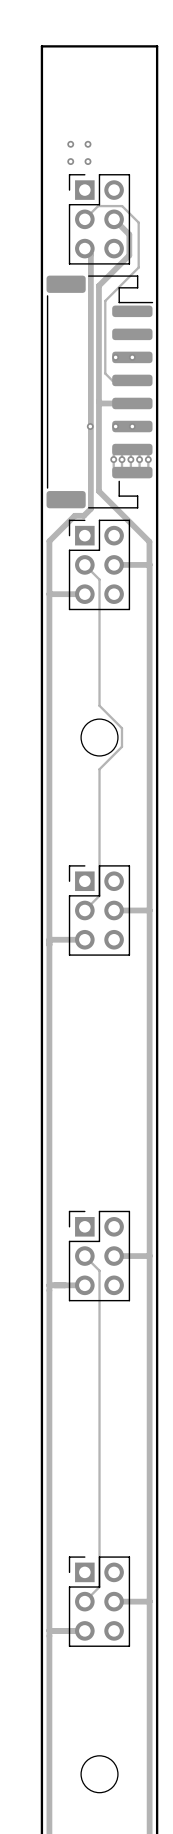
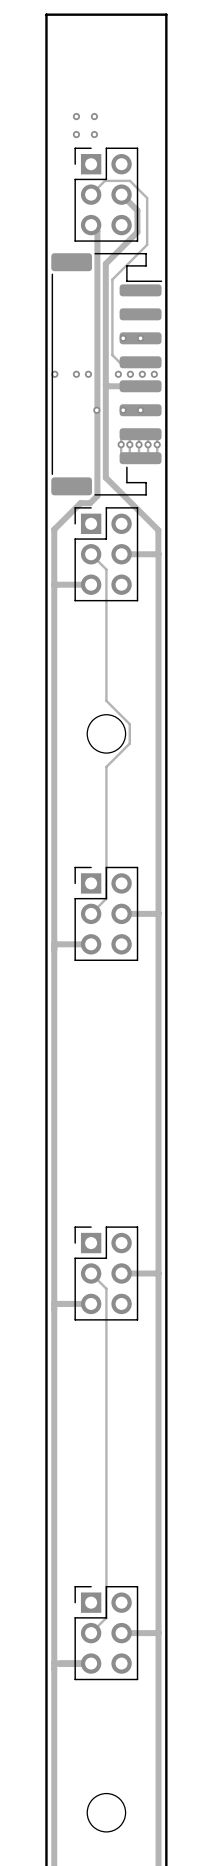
via: none -> (54, 374)
via: none -> (76, 374)
via: none -> (88, 374)
via: none -> (118, 374)
via: none -> (130, 374)
via: none -> (142, 374)
via: none -> (154, 374)

